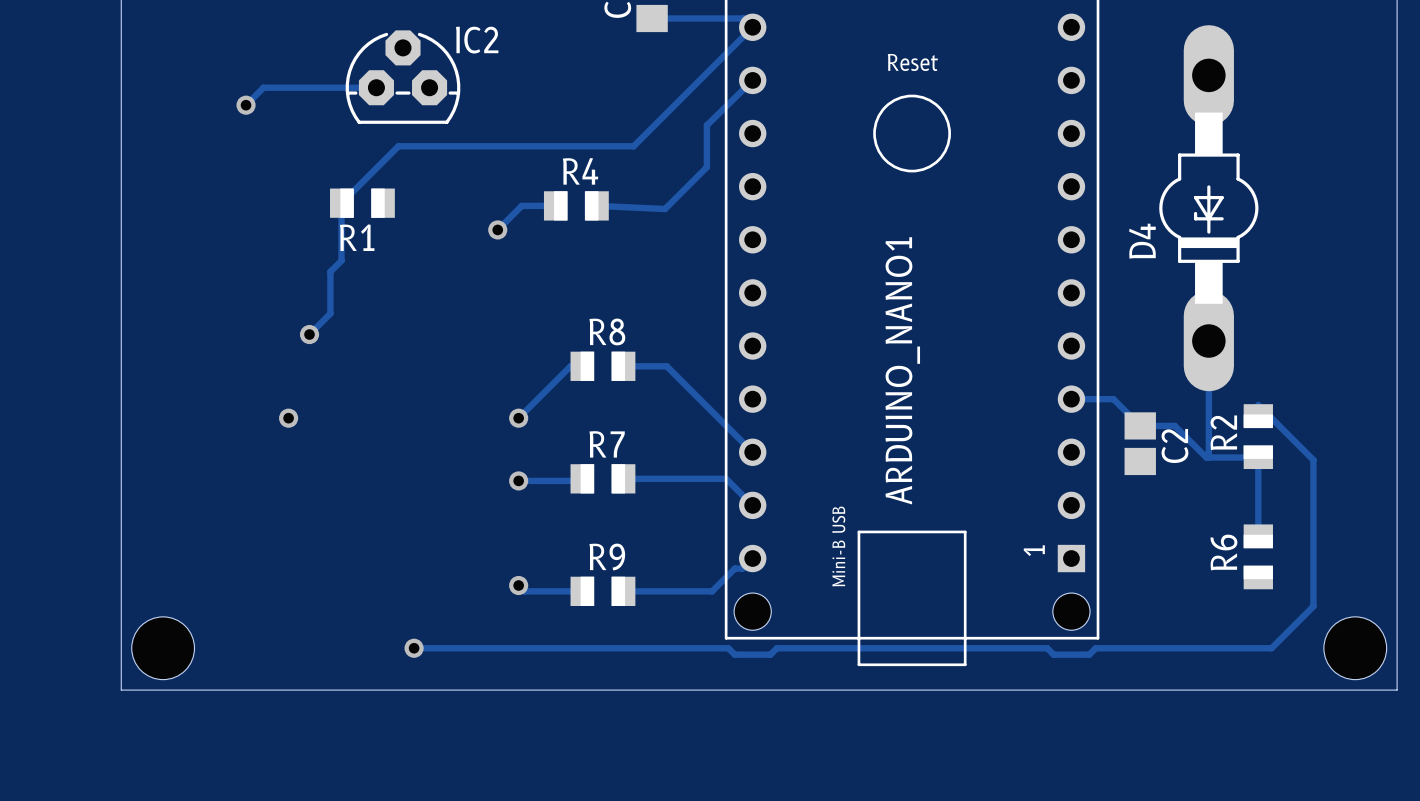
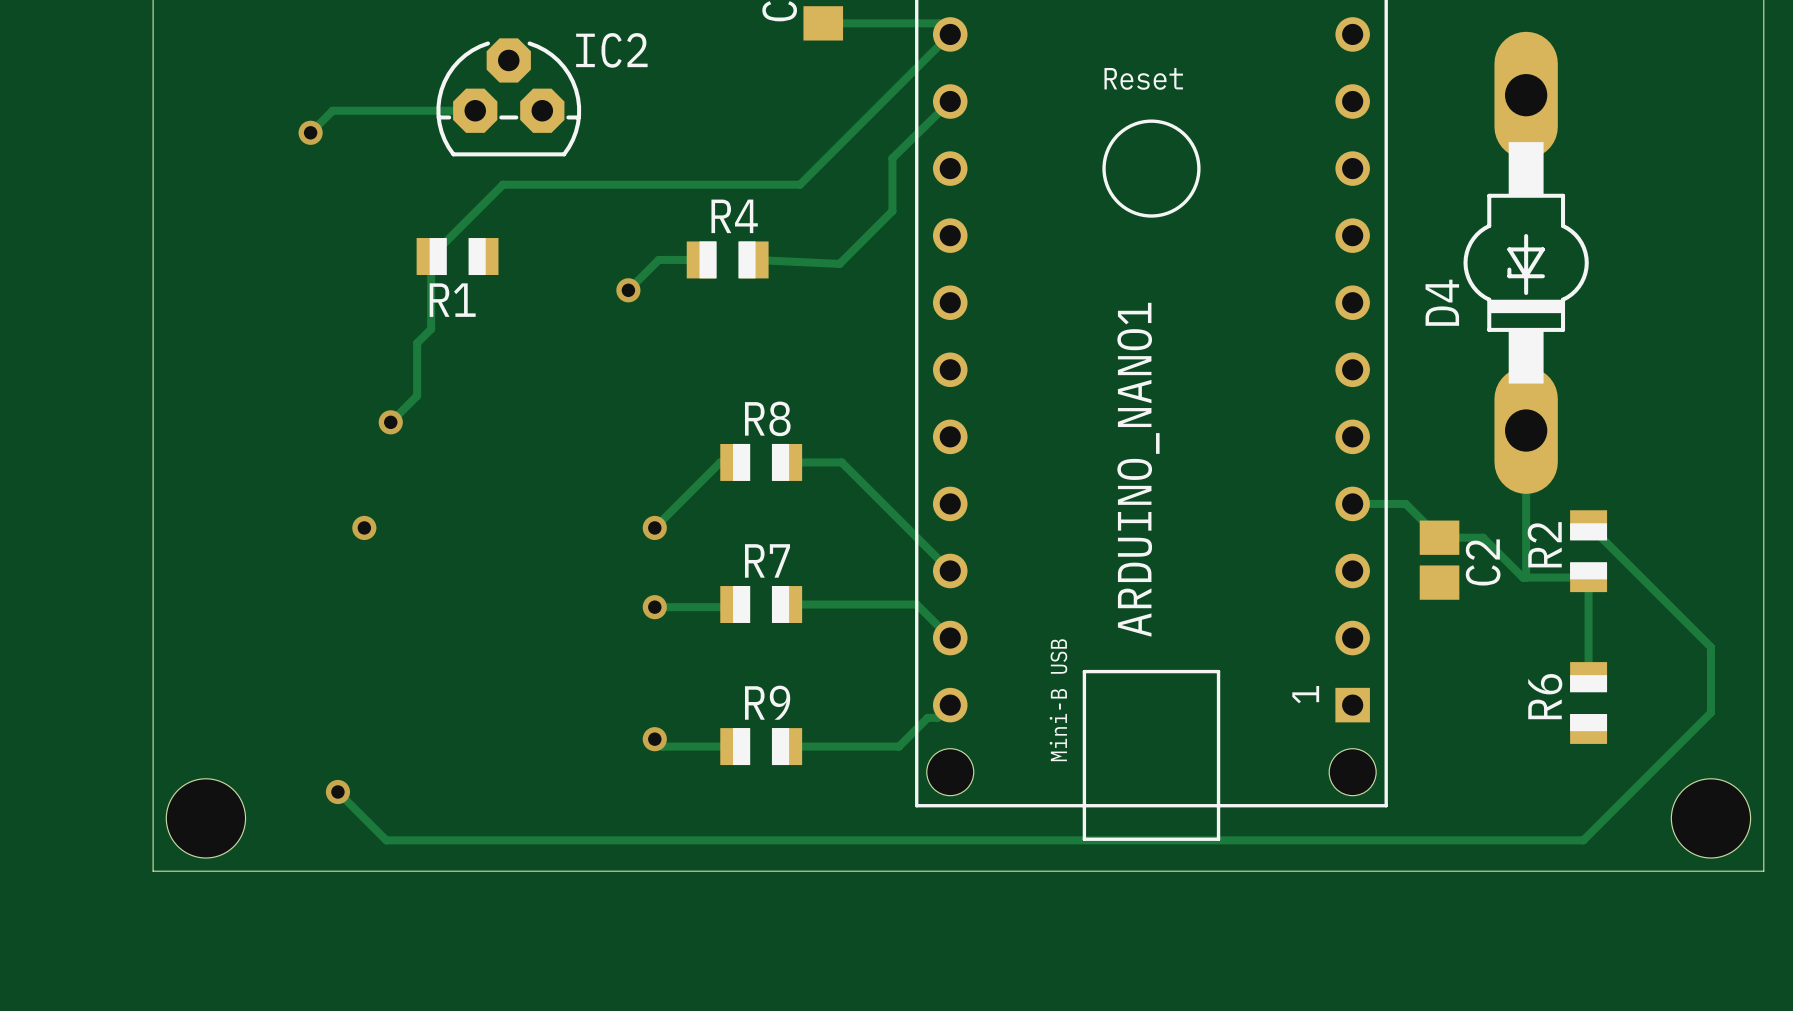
track: (1258, 404) (1258, 415) (1269, 415) (1313, 460) (1313, 606) -> (1588, 524) (1710, 647) (1710, 712) (1658, 765)
via: none -> (337, 791)
track: (414, 648) (728, 648) (734, 654) (770, 654) (776, 648) (1047, 648) (1053, 654) (1089, 654) (1095, 648) (1271, 648) -> (337, 791) (386, 840) (1583, 840) (1605, 818)
via: (414, 648) -> none

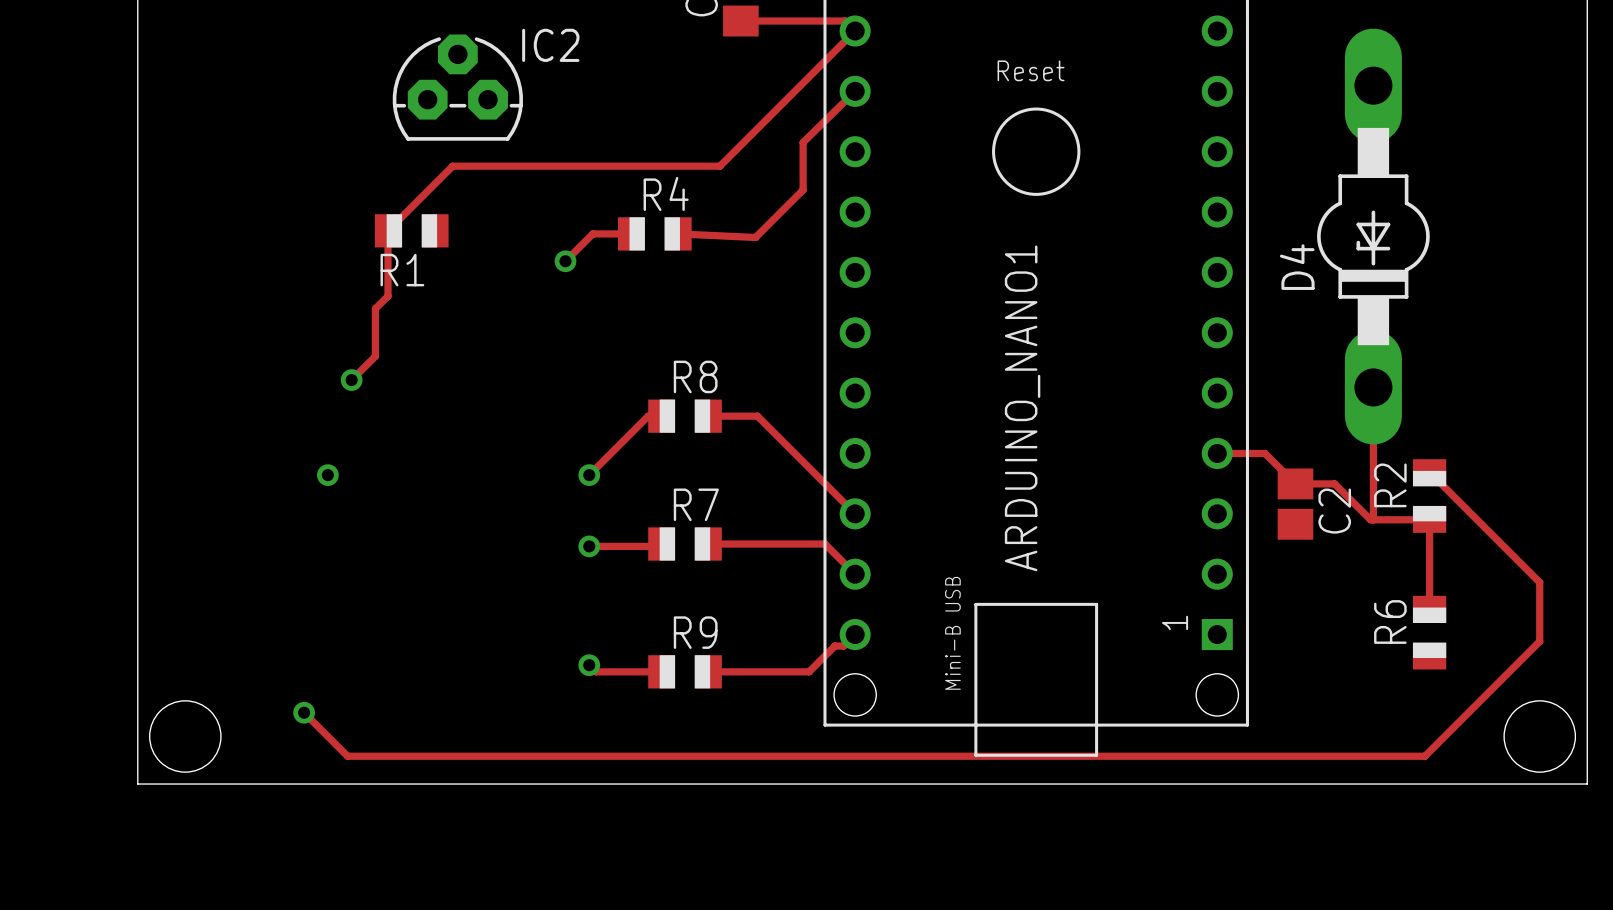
track: (475, 110) (332, 110) (310, 132) -> none
via: (310, 132) -> none

